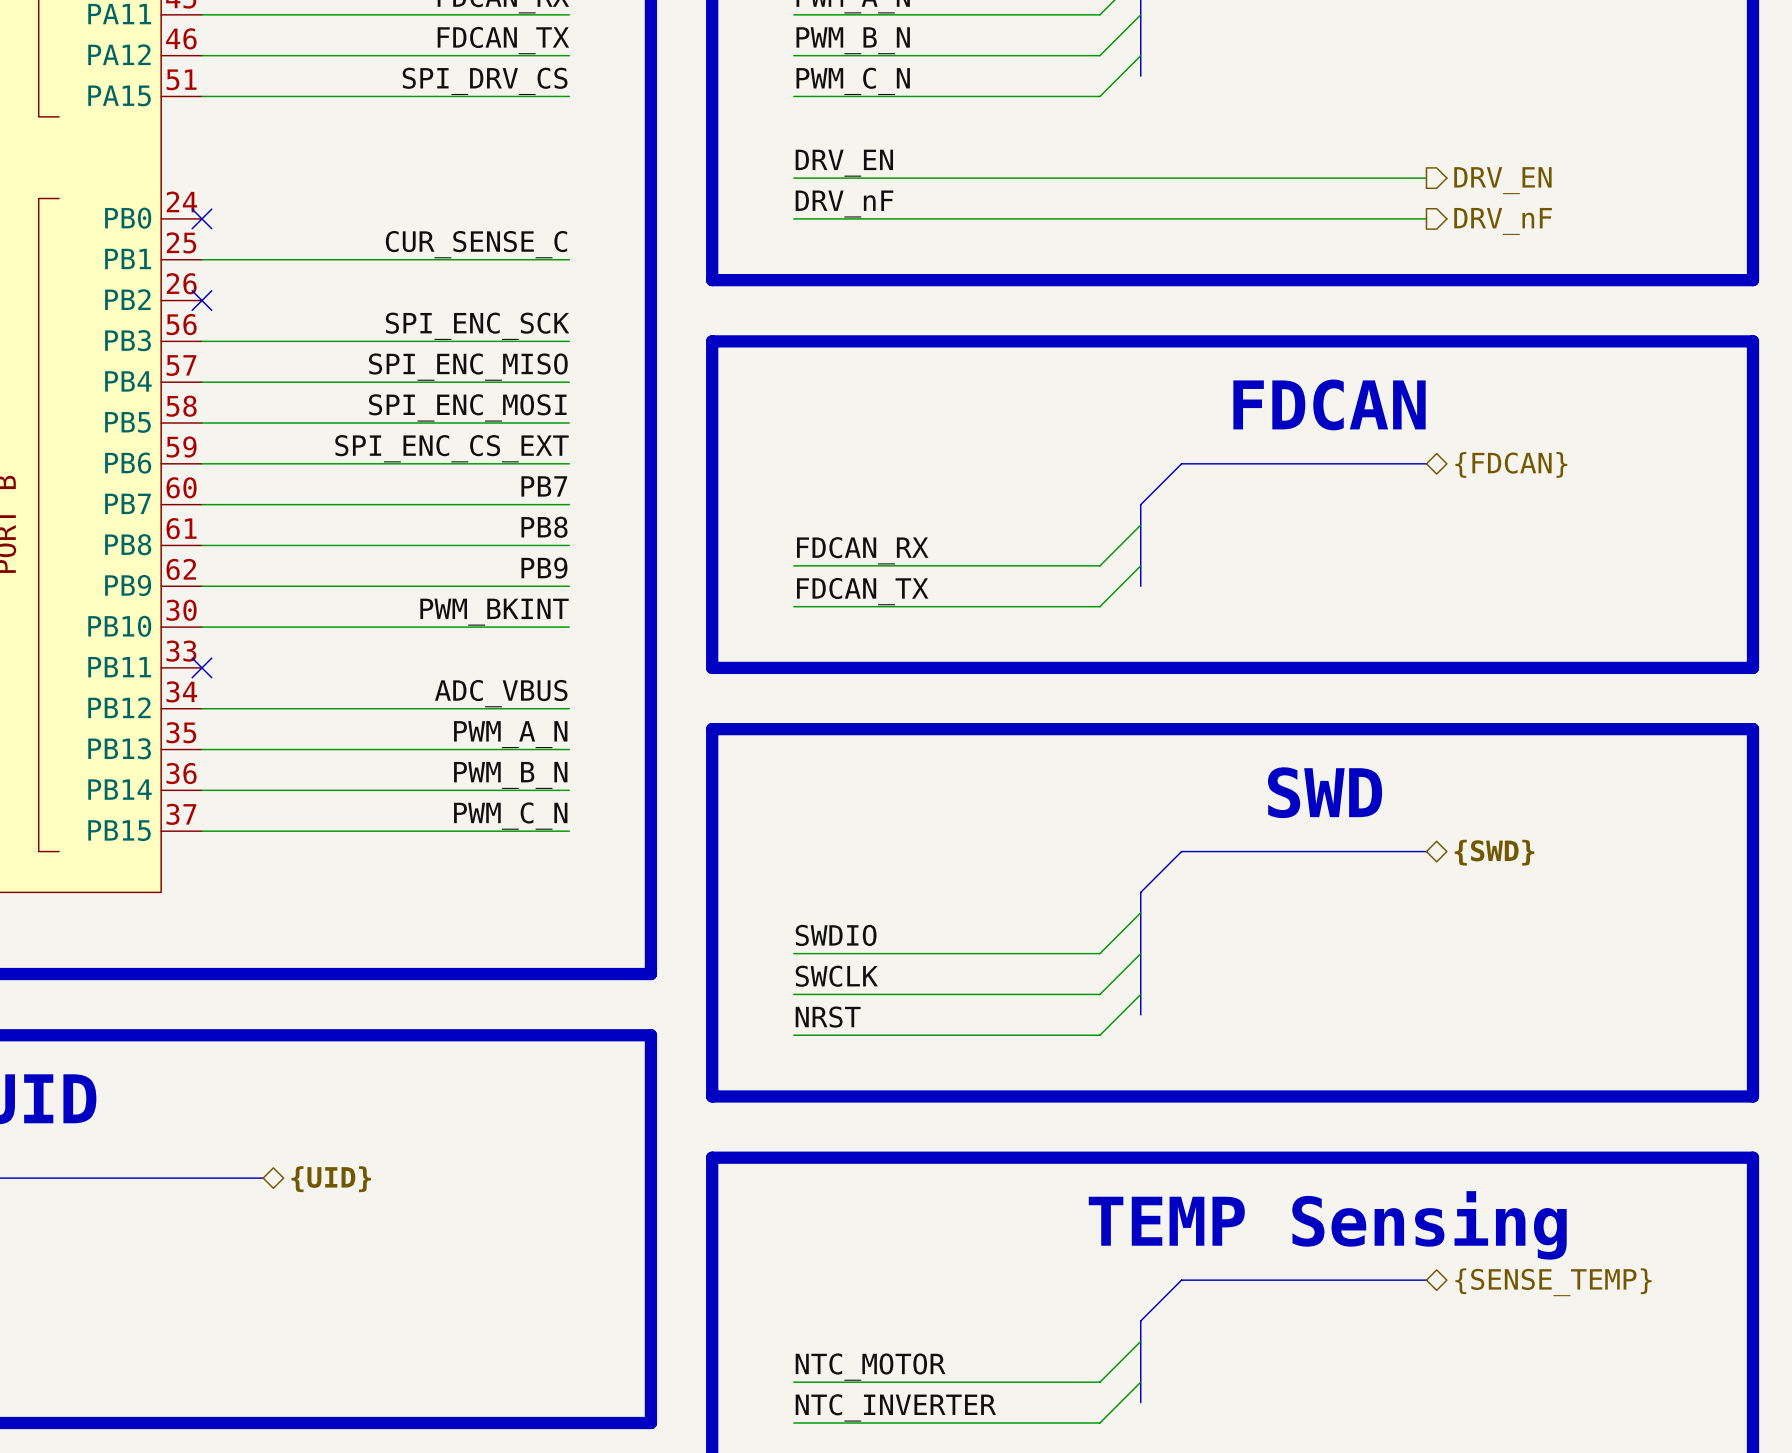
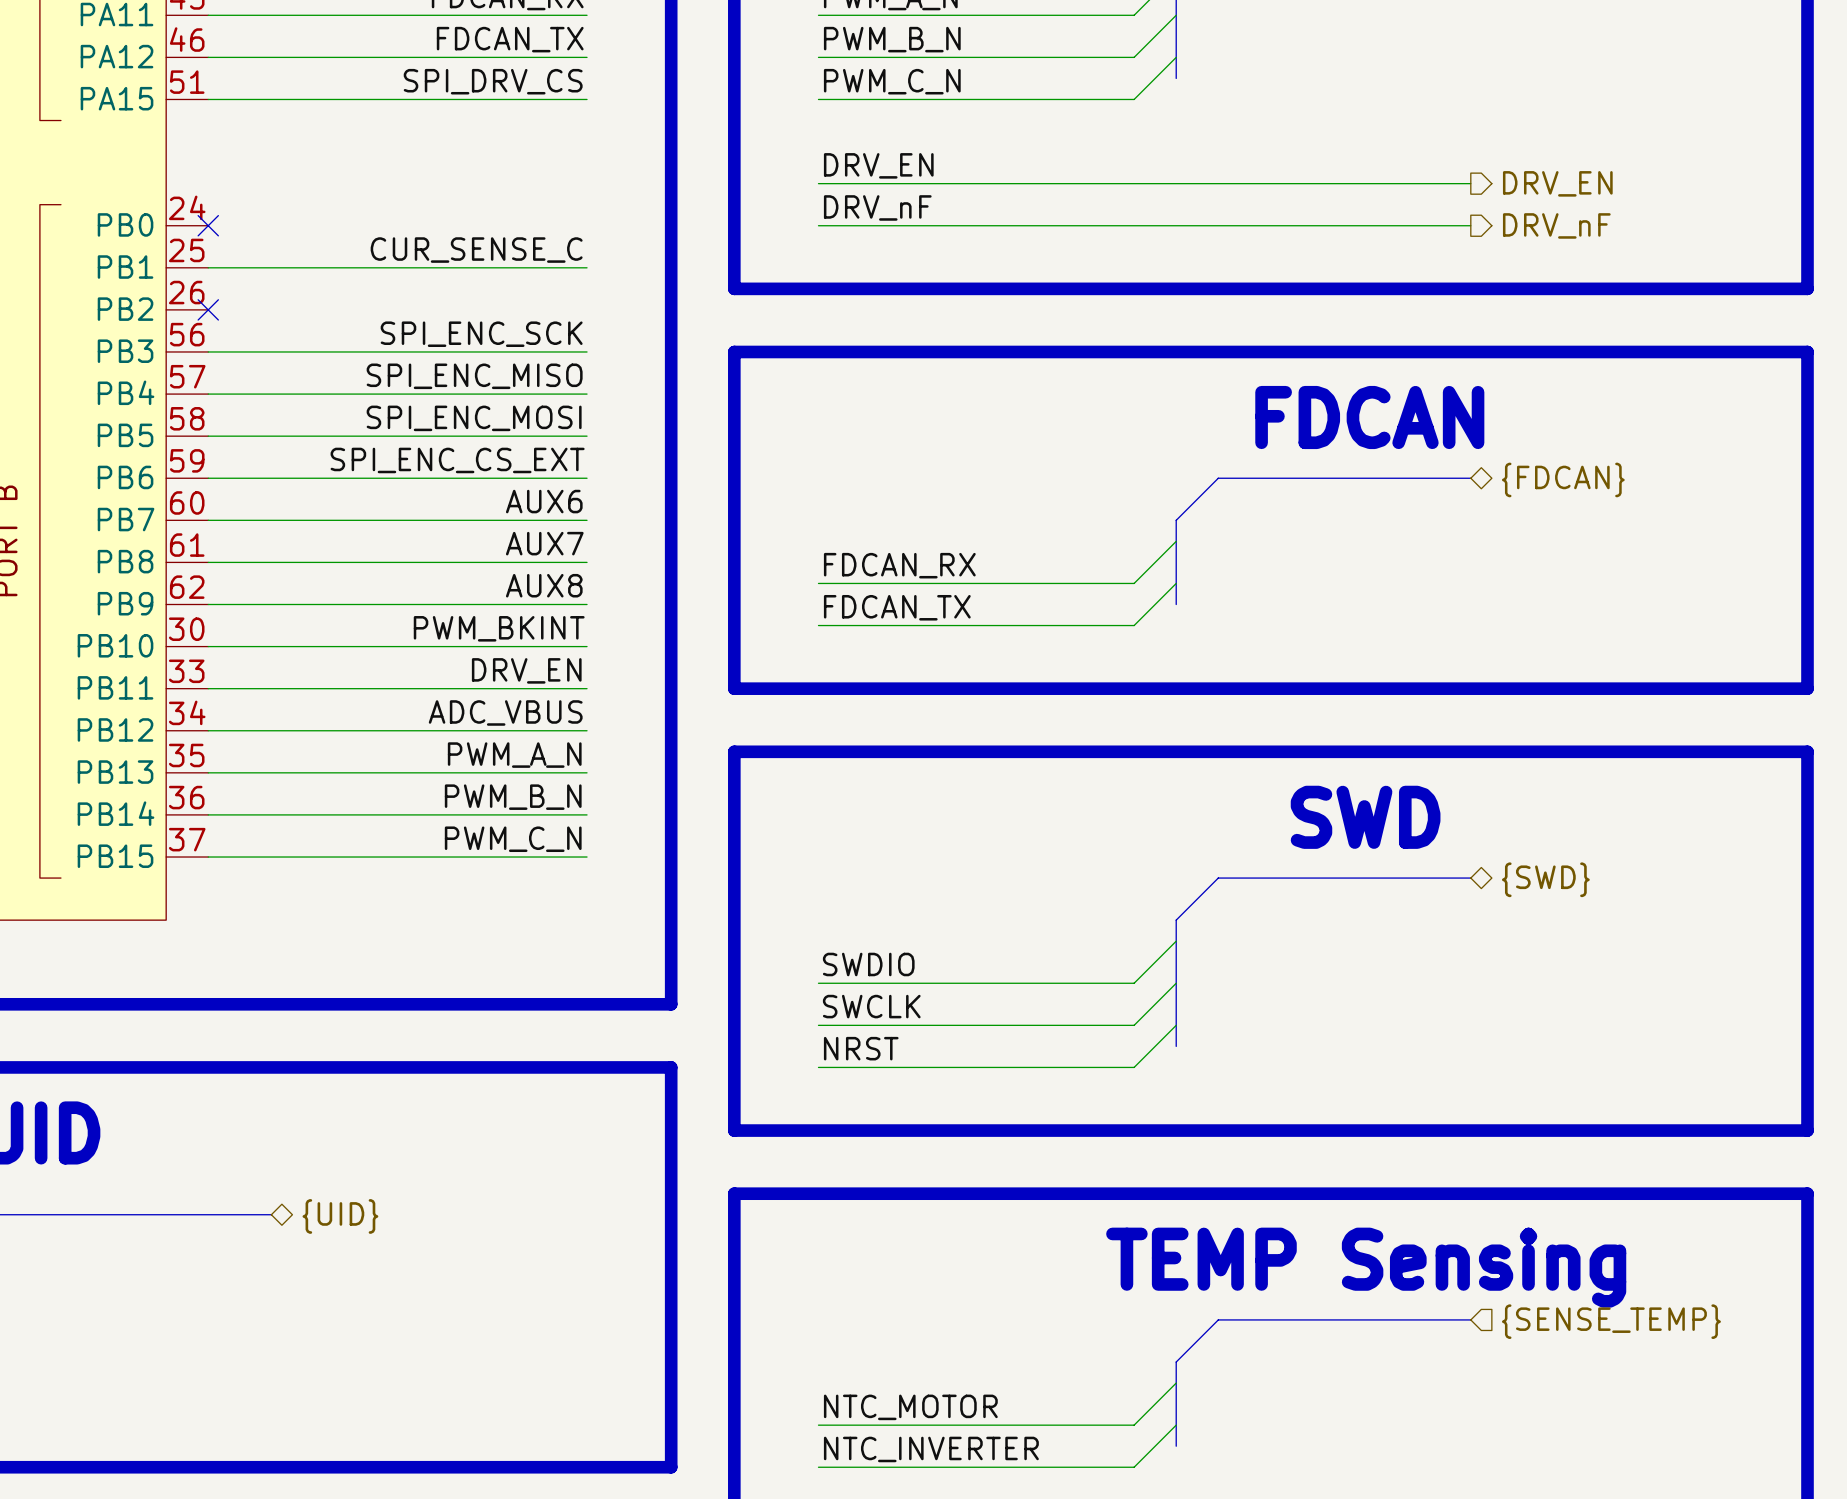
label: PB7 (544, 486) -> AUX6 (544, 501)
label: PB8 (544, 527) -> AUX7 (544, 543)
label: PB9 (544, 568) -> AUX8 (544, 585)
label: none -> DRV_EN (526, 670)
wire: none -> (208, 688) (587, 688)
no-connect mark: (201, 667) -> none
hierarchical label shape: bidirectional (1553, 1282) -> input (1611, 1321)

